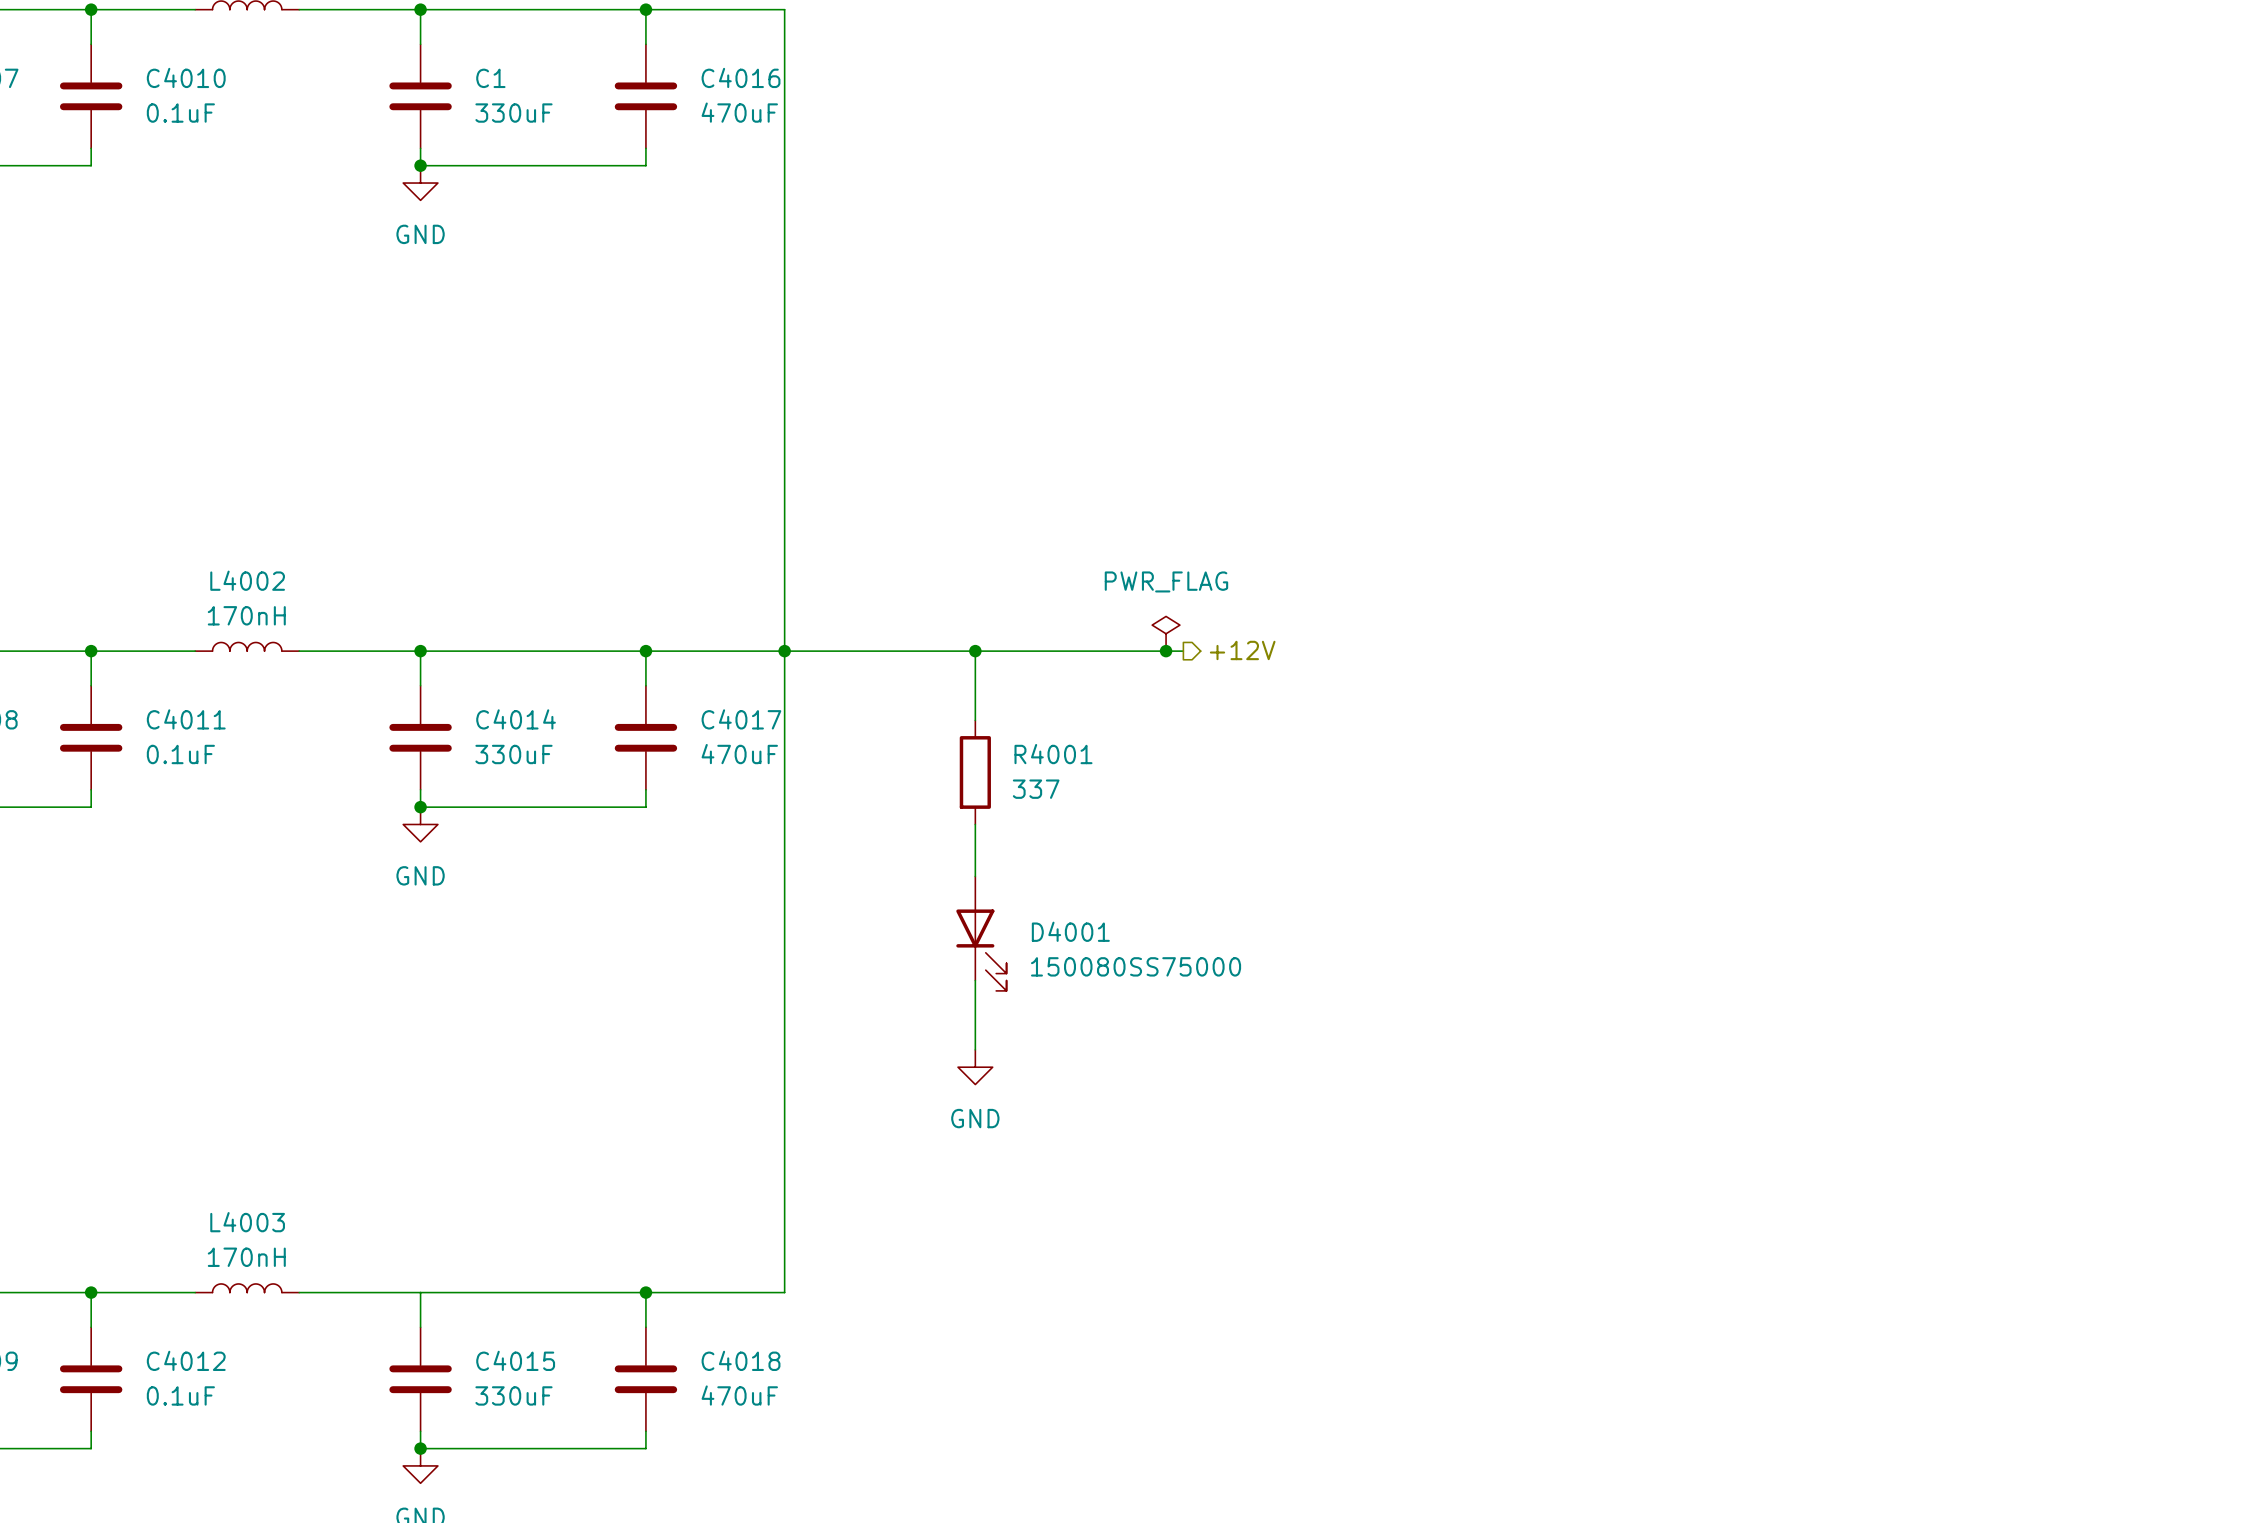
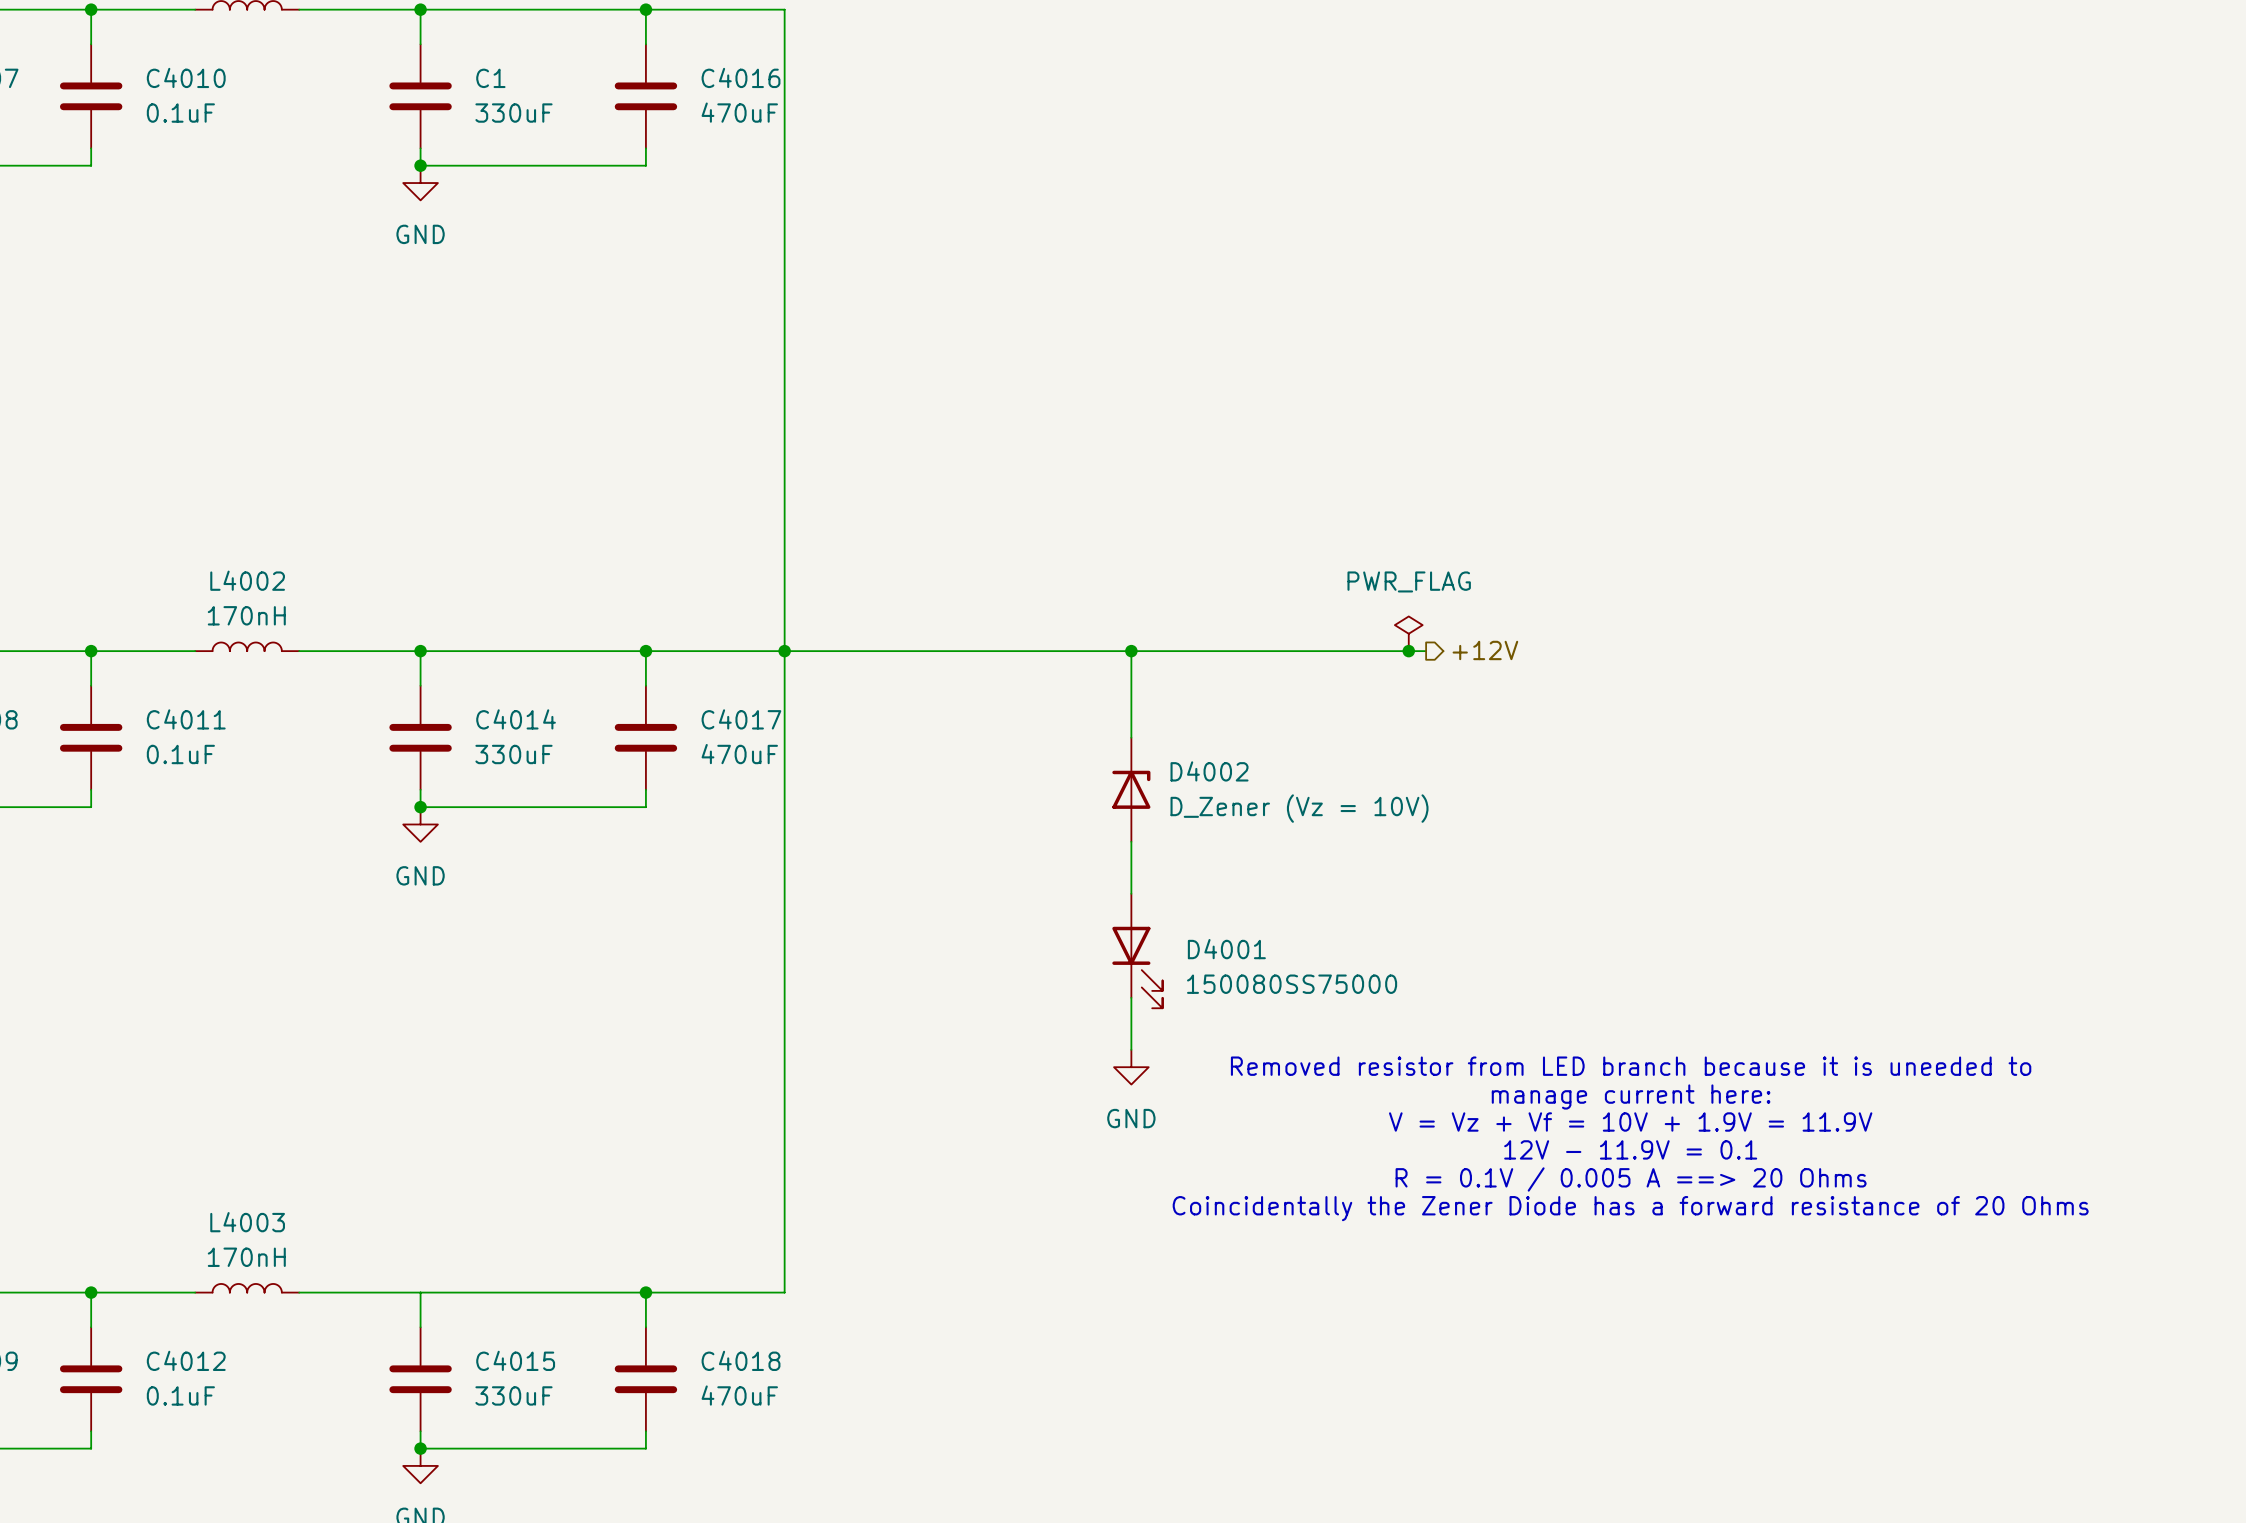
power symbol position: PWR_FLAG (1166, 633) -> PWR_FLAG (1408, 633)
hierarchical label position: +12V (1242, 650) -> +12V (1485, 650)
wire: (975, 651) (975, 720) -> none
junction: (975, 651) -> none
wire: none -> (1131, 651) (1131, 737)
junction position: (1166, 651) -> (1131, 651)
wire: none -> (1183, 651) (1426, 651)
junction: none -> (1408, 651)
R4001: 337 (975, 772) -> none
D4002: none -> D_Zener (Vz = 10V) (1131, 789)
wire: (975, 824) (975, 876) -> (1131, 841) (1131, 893)
D4001 position: (981, 933) -> (1137, 951)
wire: (975, 980) (975, 1049) -> none
wire: none -> (1131, 997) (1131, 1049)
text: none -> Removed resistor from LED branch because it is uneeded to (1631, 1066)
power symbol position: GND (975, 1067) -> GND (1131, 1067)
text: none -> manage current here: (1631, 1096)
text: none -> V = Vz + Vf = 10V + 1.9V = 11.9V (1630, 1122)
text: none -> 12V - 11.9V = 0.1 (1630, 1149)
text: none -> R = 0.1V / 0.005 A ==> 20 Ohms (1631, 1179)
text: none -> Coincidentally the Zener Diode has a forward resistance of 20 Ohms (1630, 1208)

